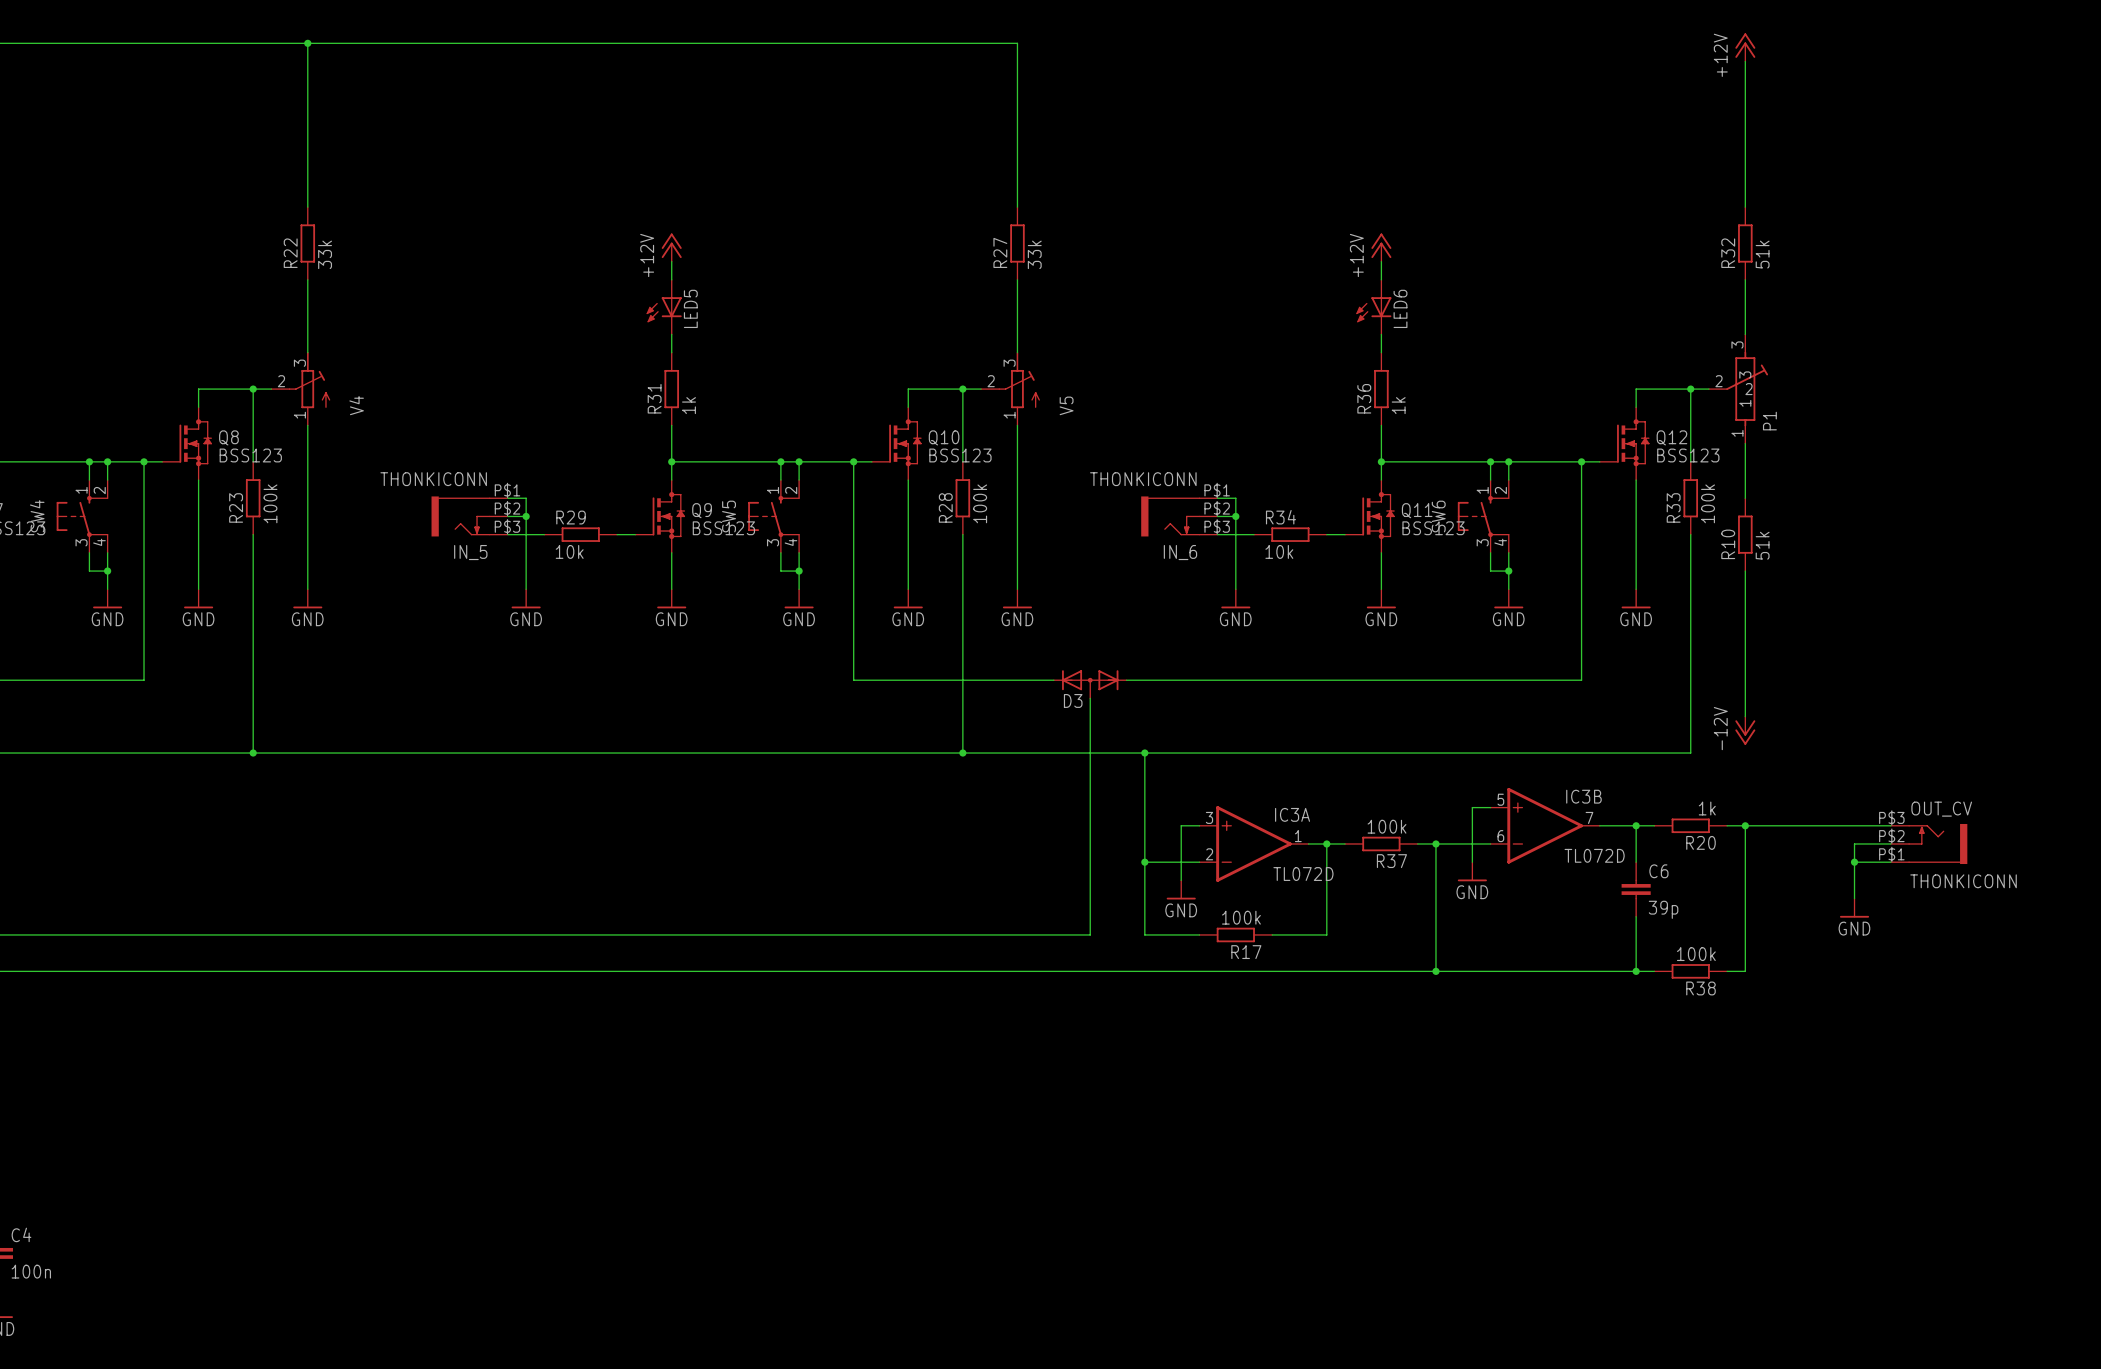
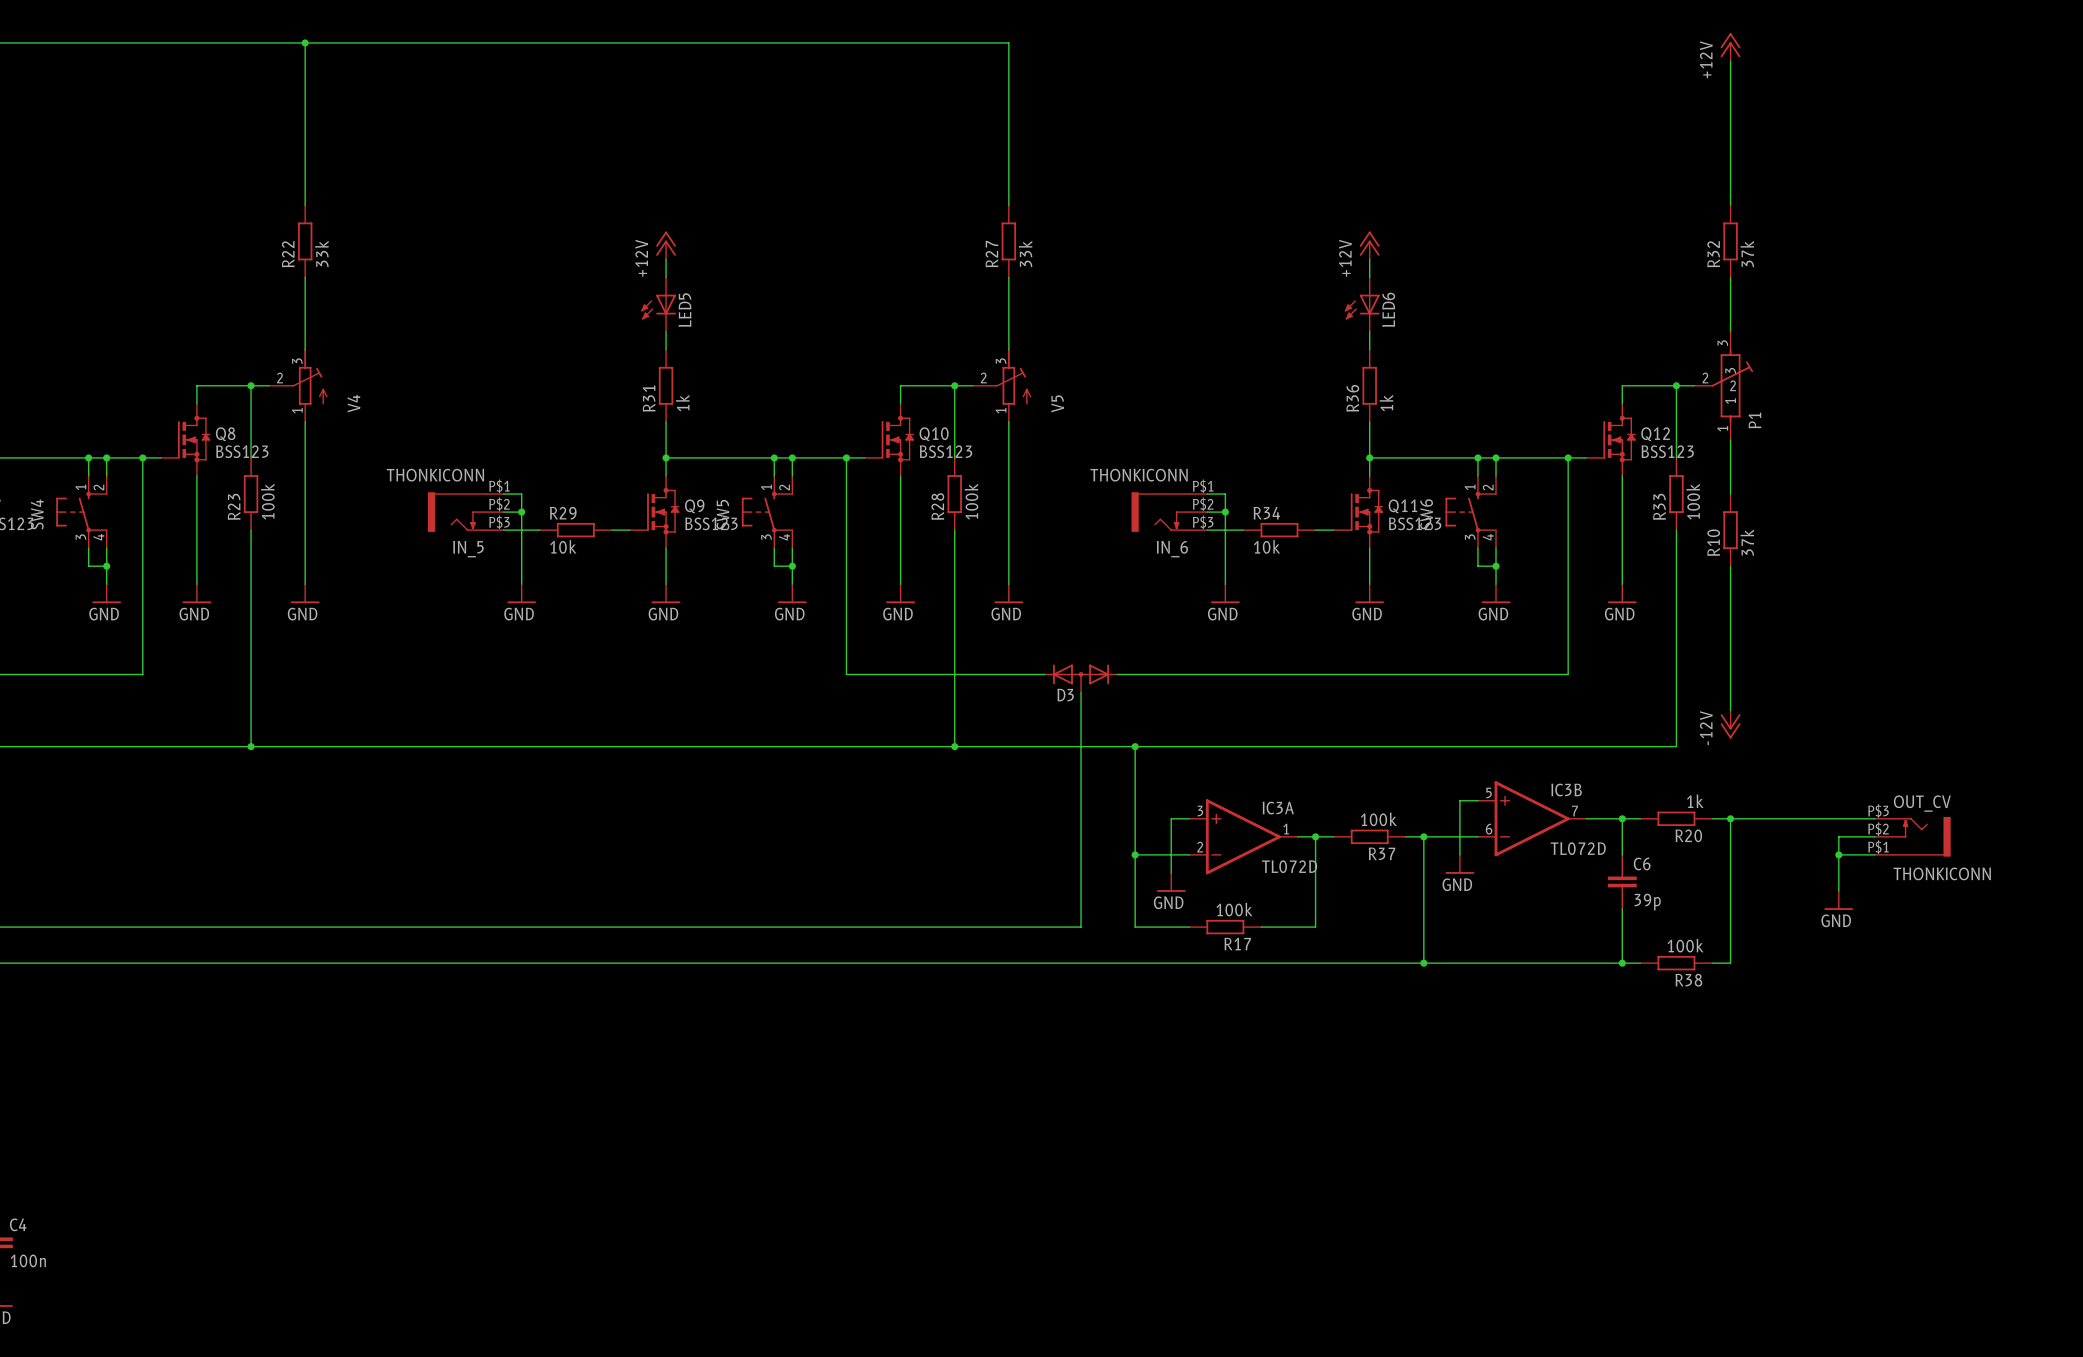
R32 value: 51k (1762, 254) -> 37k (1747, 253)
R10 value: 51k (1762, 545) -> 37k (1747, 542)

